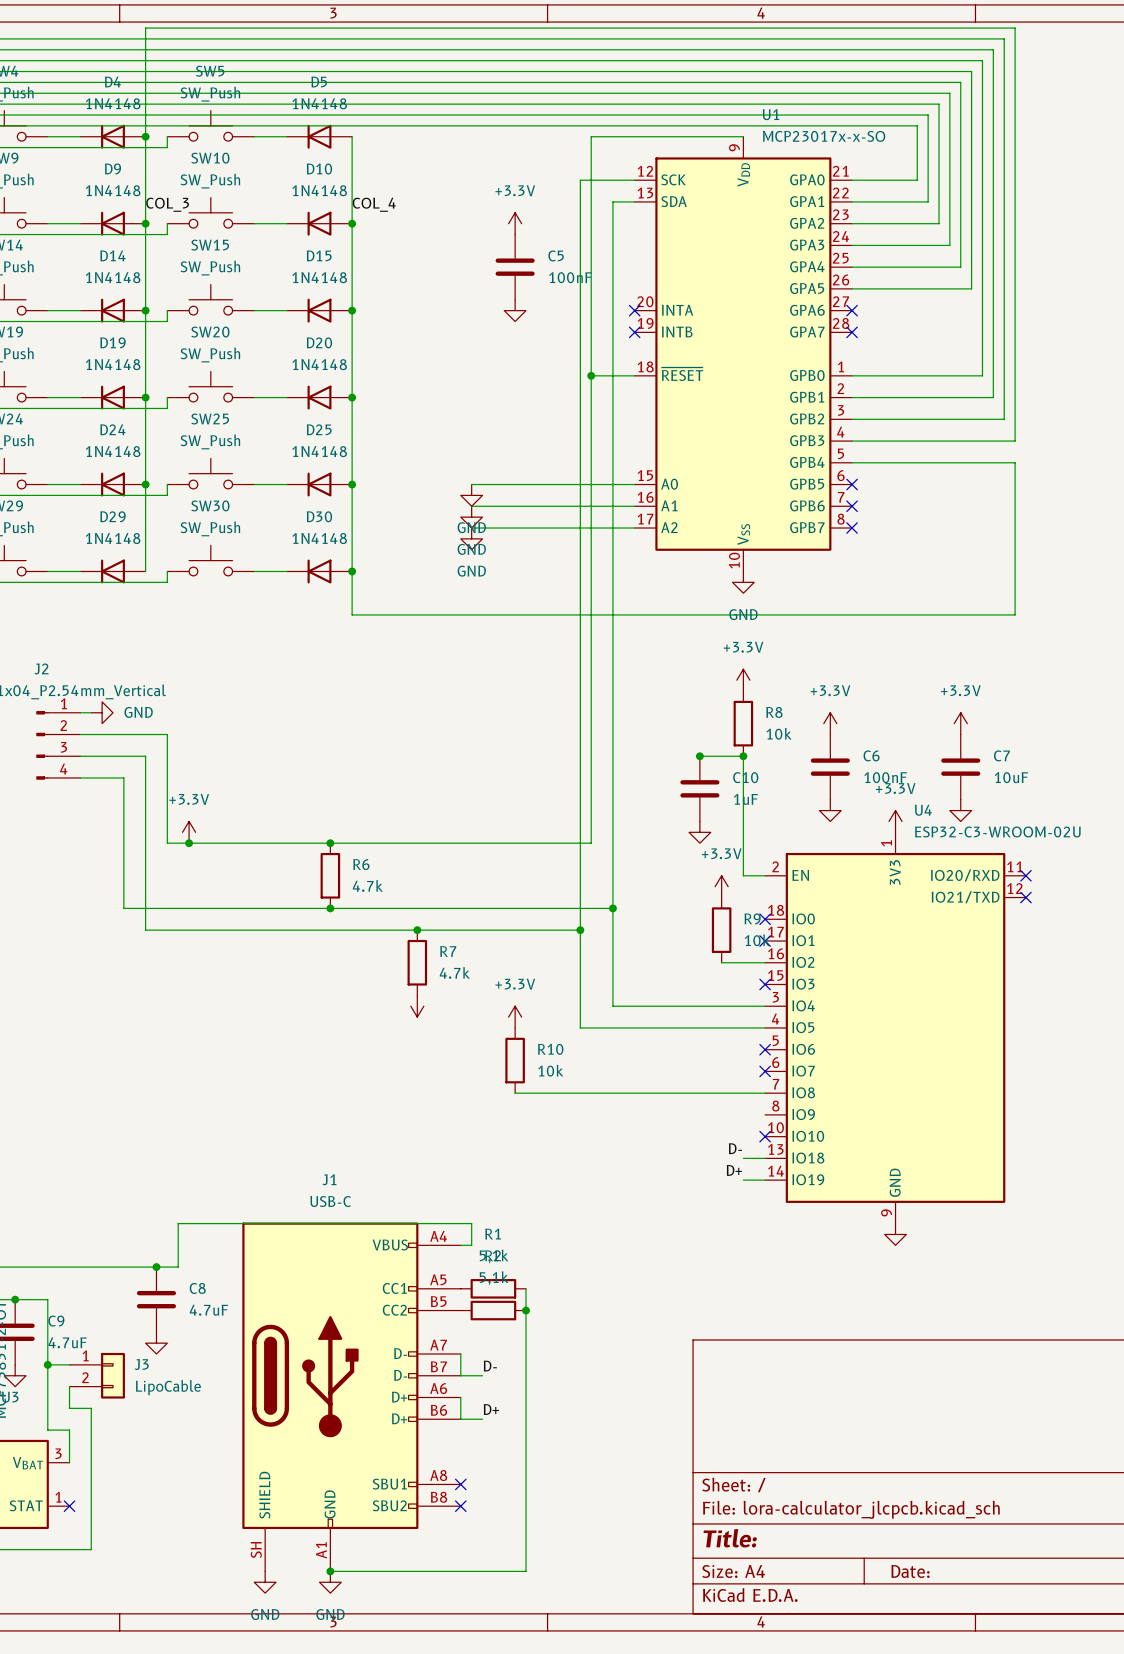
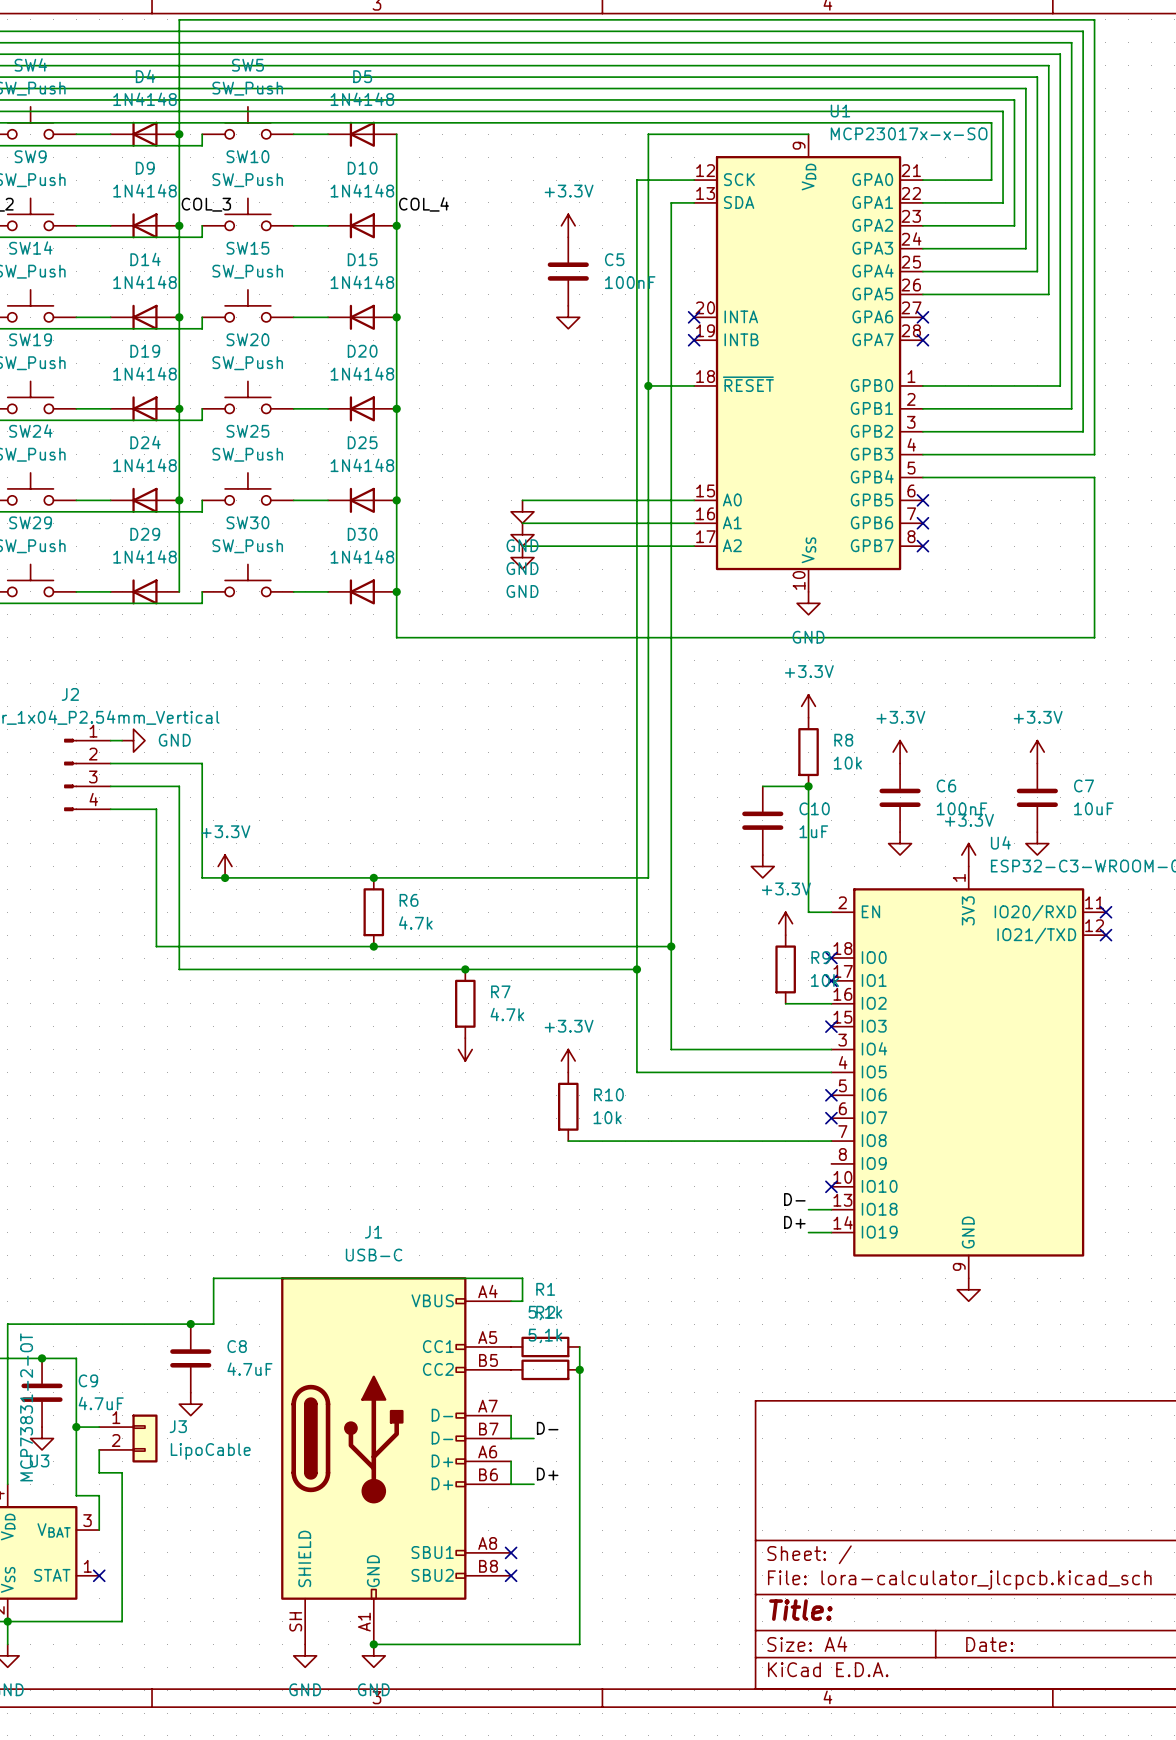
junction: (699, 756) -> none

